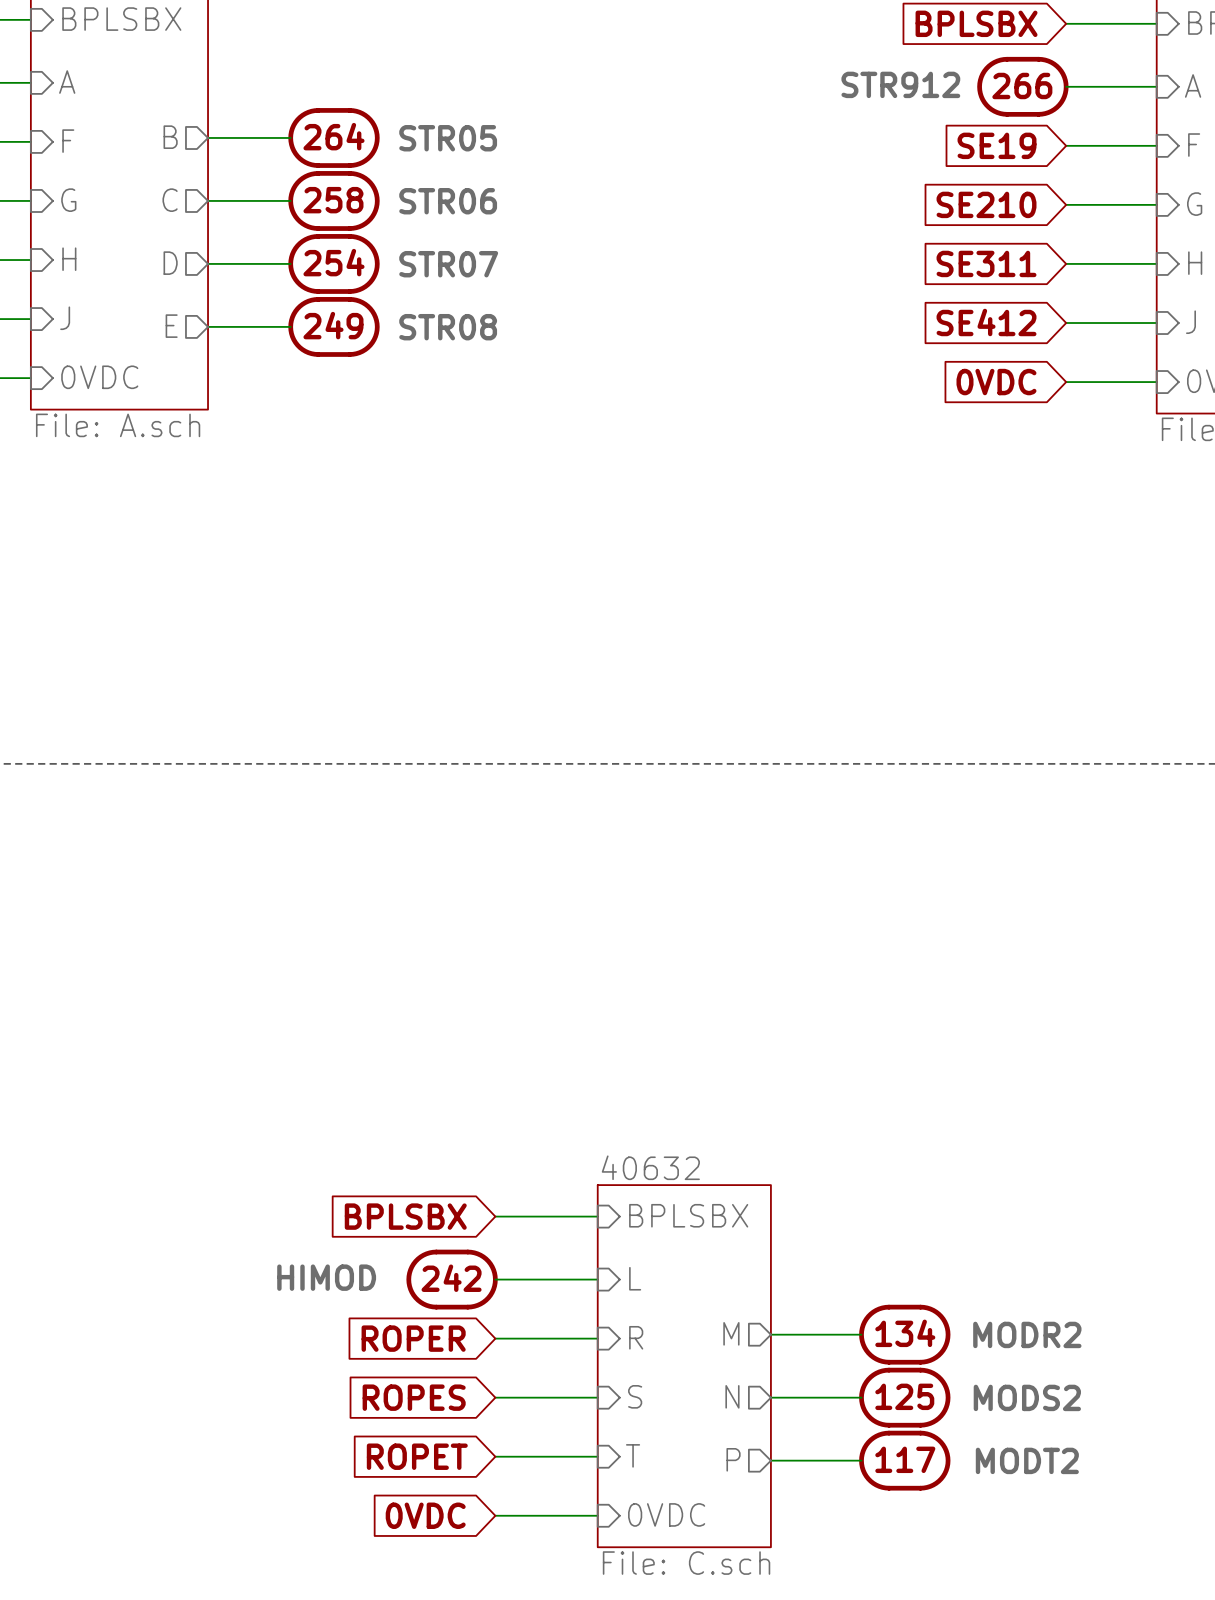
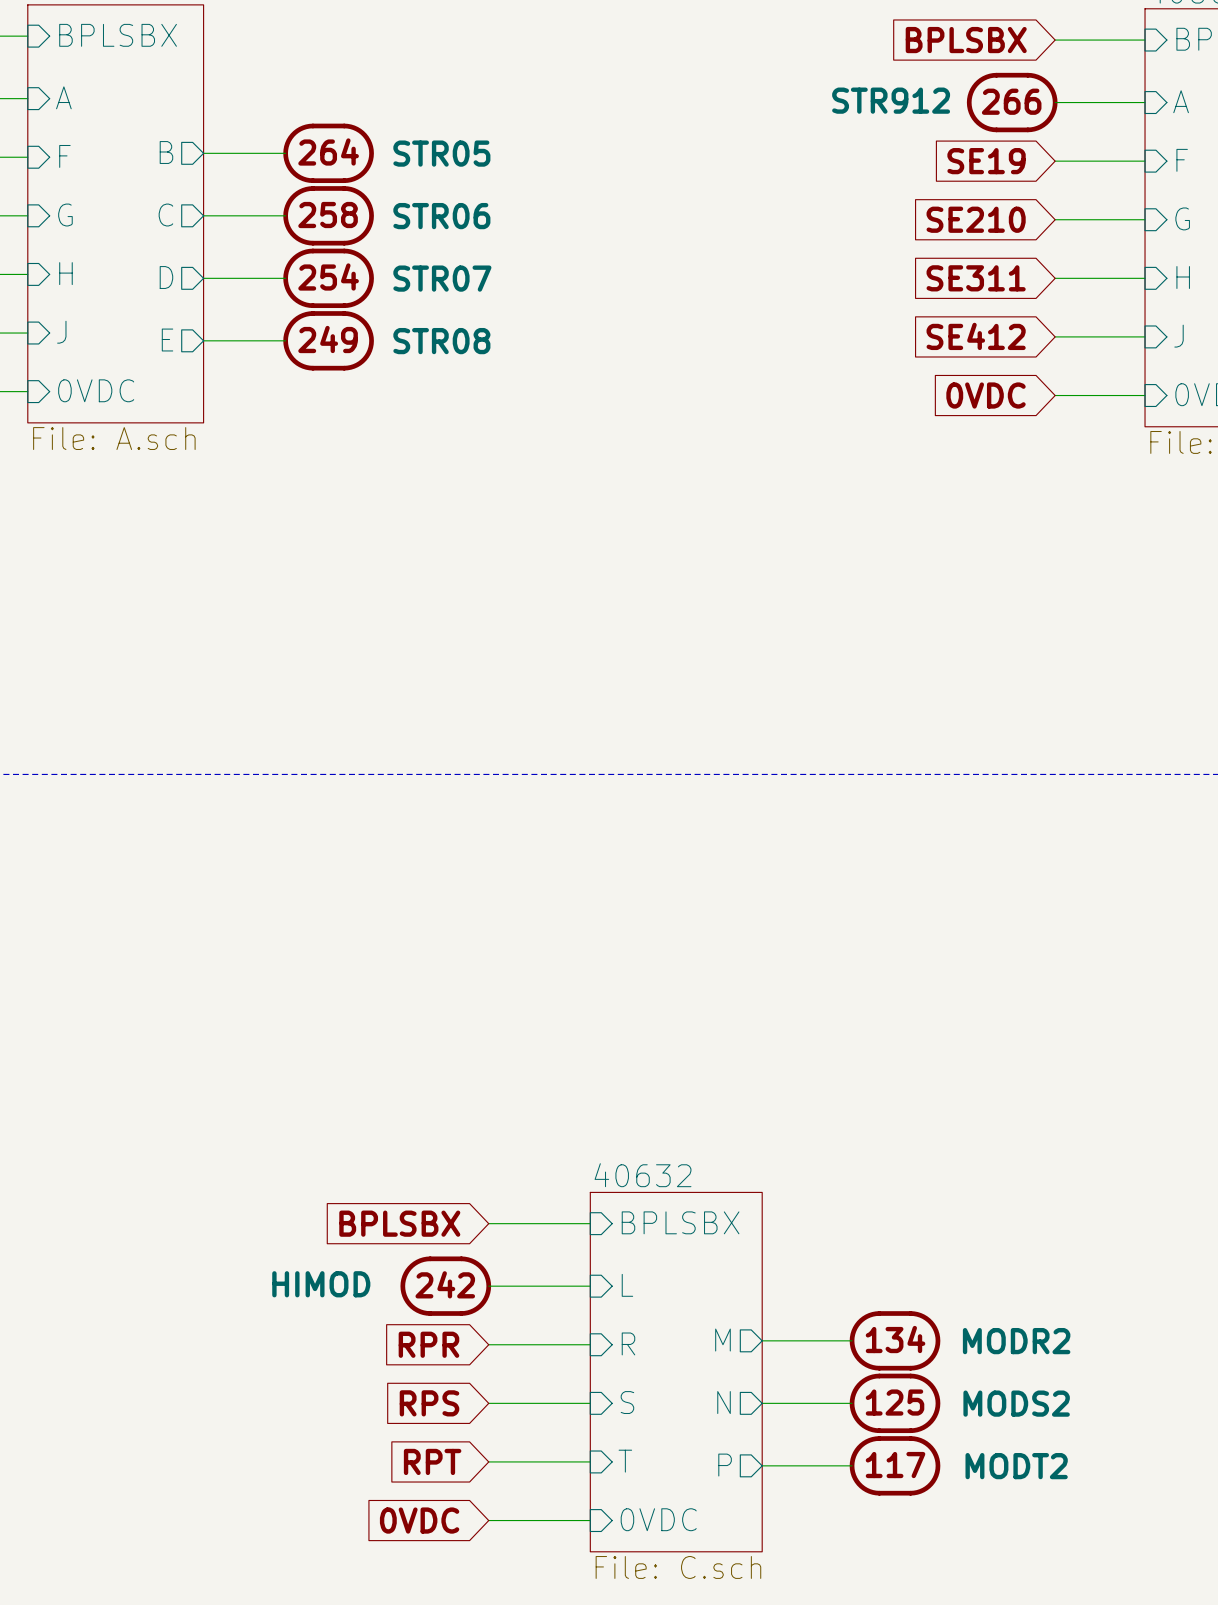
global label: ROPER (413, 1338) -> RPR (428, 1344)
global label: ROPES (414, 1397) -> RPS (429, 1403)
global label: ROPET (417, 1456) -> RPT (432, 1461)

